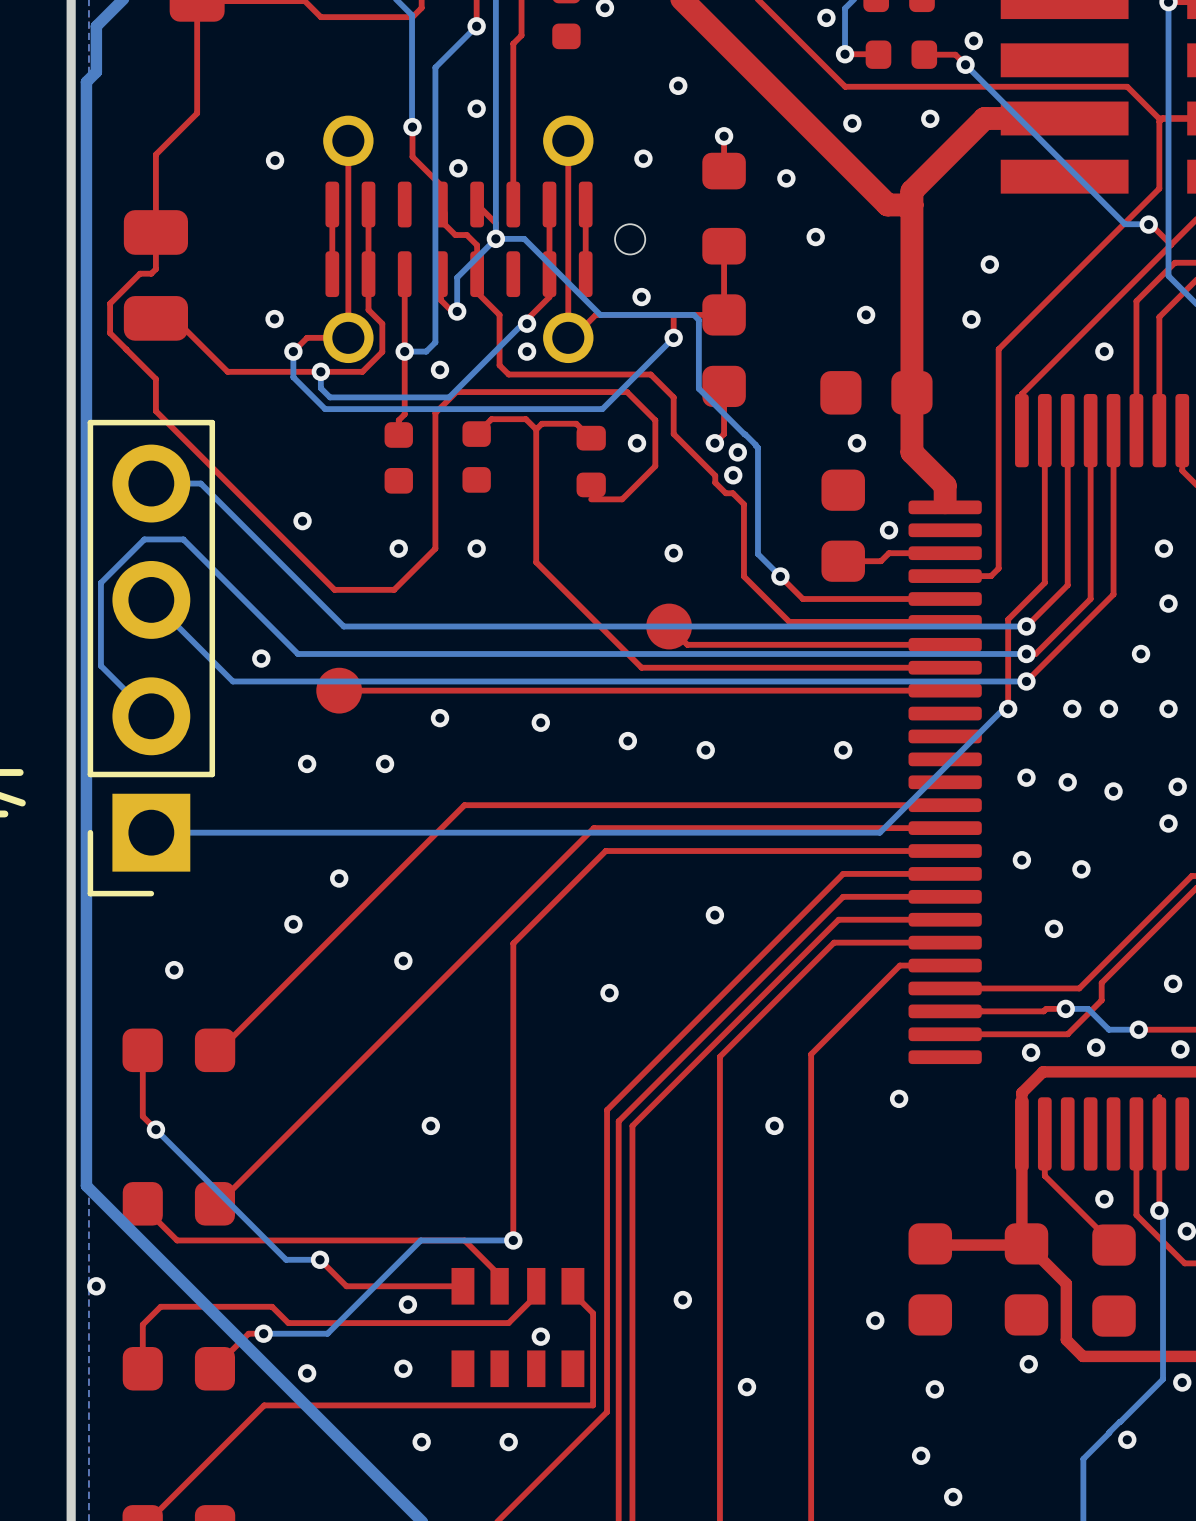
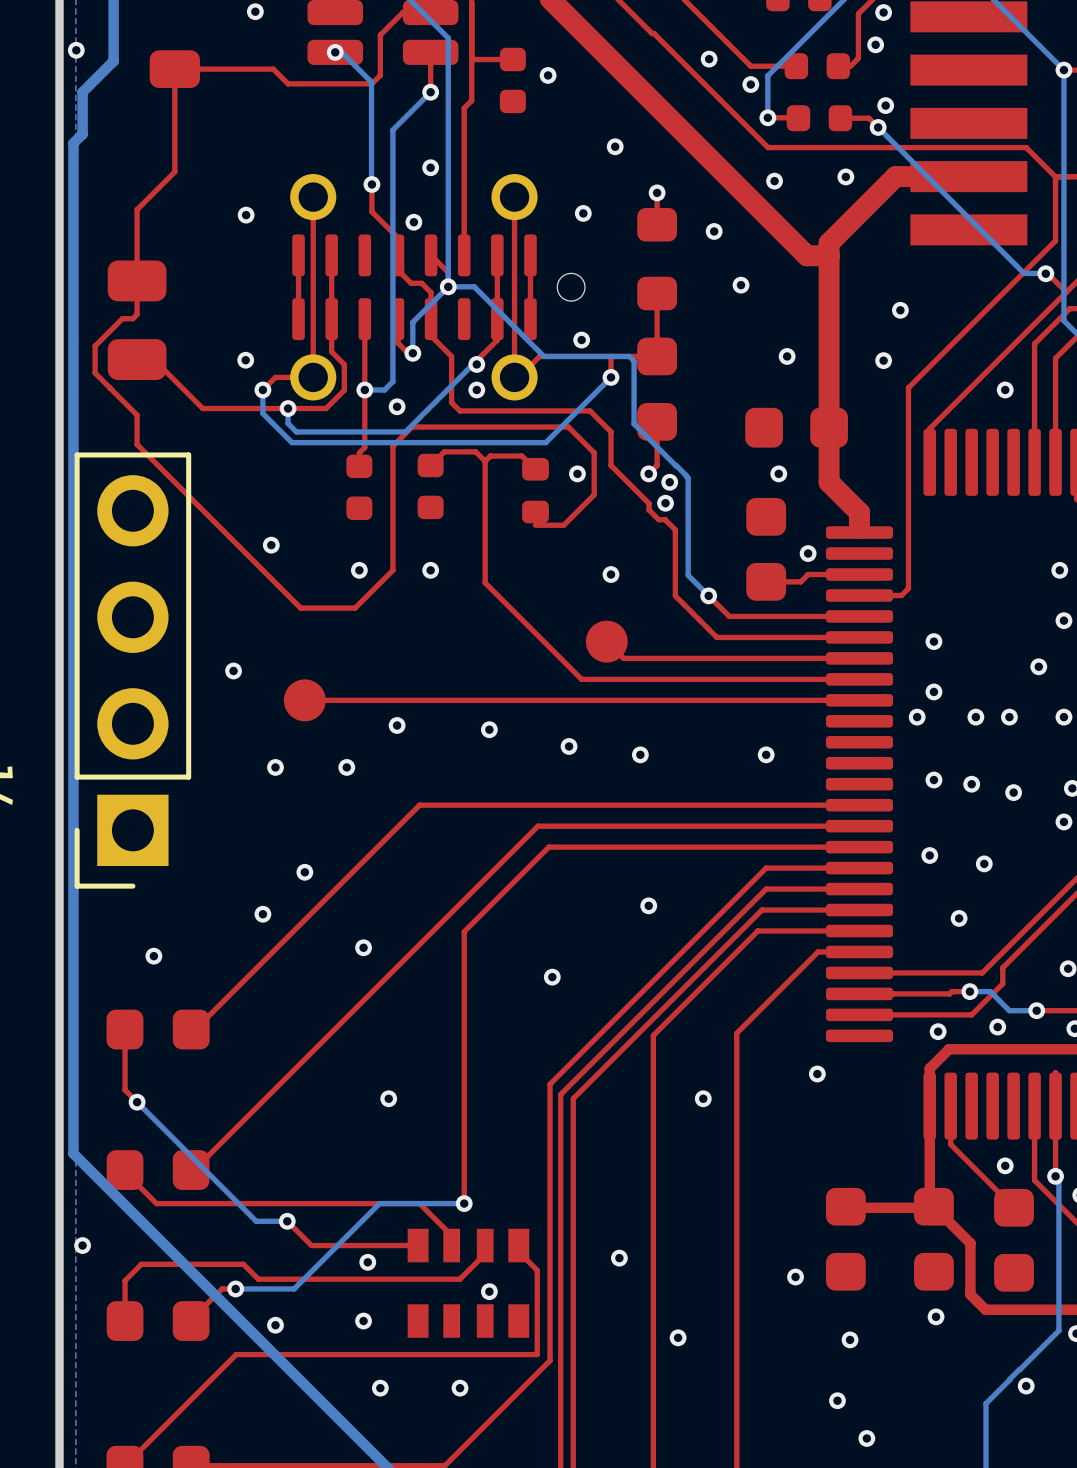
top track: (1044, 430) (1044, 582) (1008, 619) (1008, 708) -> none
top track: (1067, 430) (1067, 585) (1026, 626) -> none
top track: (1090, 430) (1090, 599) (1035, 653) (1026, 653) -> none
top track: (1113, 430) (1113, 594) (1026, 681) -> none
bottom track: (151, 483) (200, 483) (343, 626) (1026, 626) -> none
bottom track: (151, 599) (232, 681) (1026, 681) -> none
bottom track: (1026, 653) (297, 653) (183, 539) (144, 539) (100, 582) (100, 665) (151, 716) -> none
via: (1026, 653) -> none
bottom track: (1008, 708) (1003, 708) (879, 832) (151, 832) -> none

